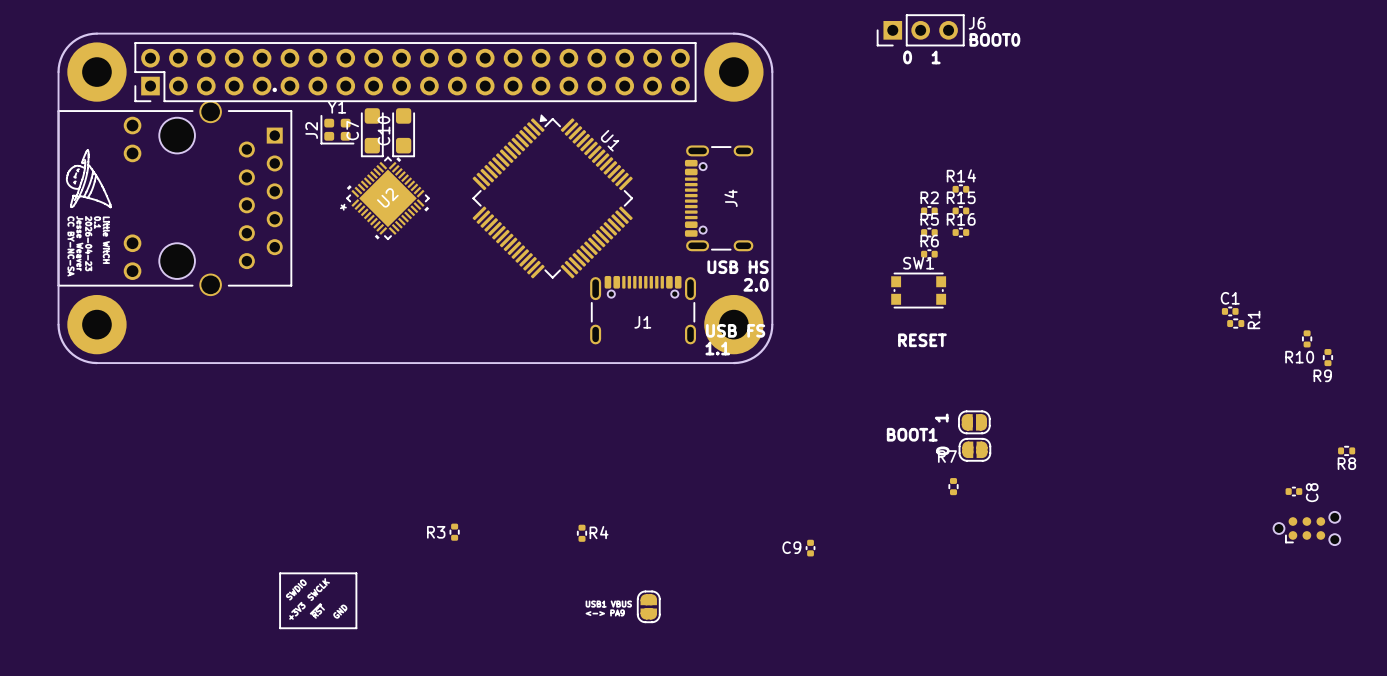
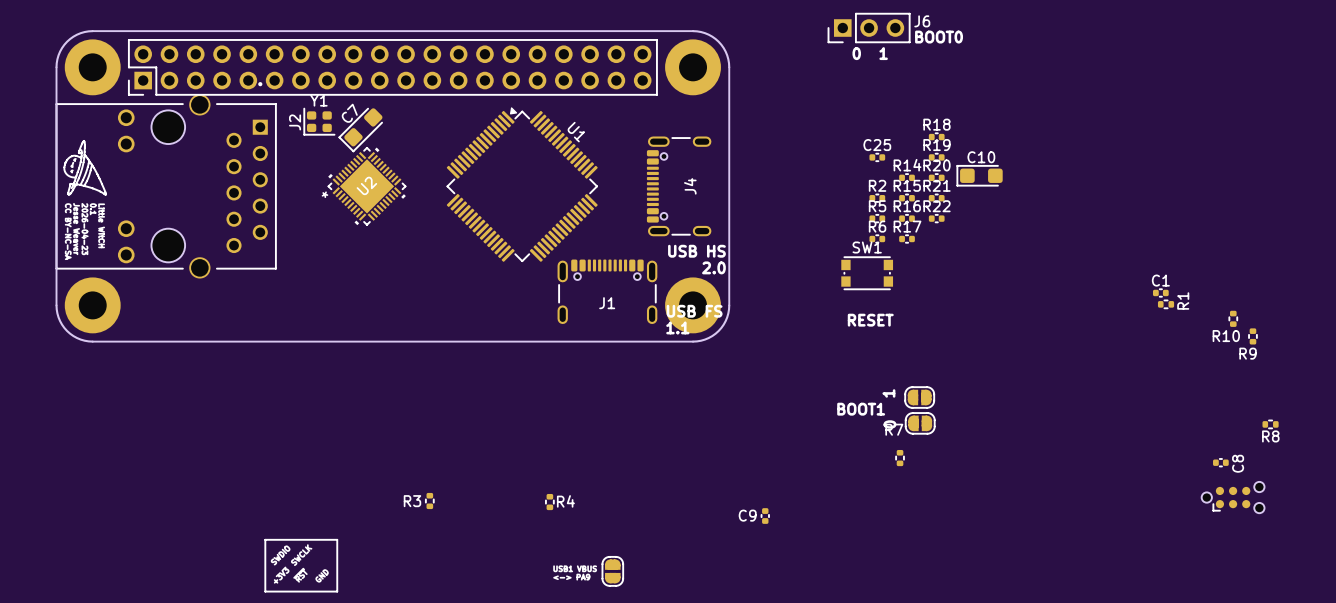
C7 rotation: 0° (372, 132) -> 45° clockwise (360, 130)
C10 rotation: 0° (403, 132) -> 90° clockwise (979, 175)
C10 position: (403, 132) -> (979, 175)
R18: none -> (936, 137)
C25: none -> (877, 157)
R19: none -> (936, 157)
R20: none -> (936, 177)
R21: none -> (936, 198)
R22: none -> (936, 218)
R17: none -> (907, 239)

